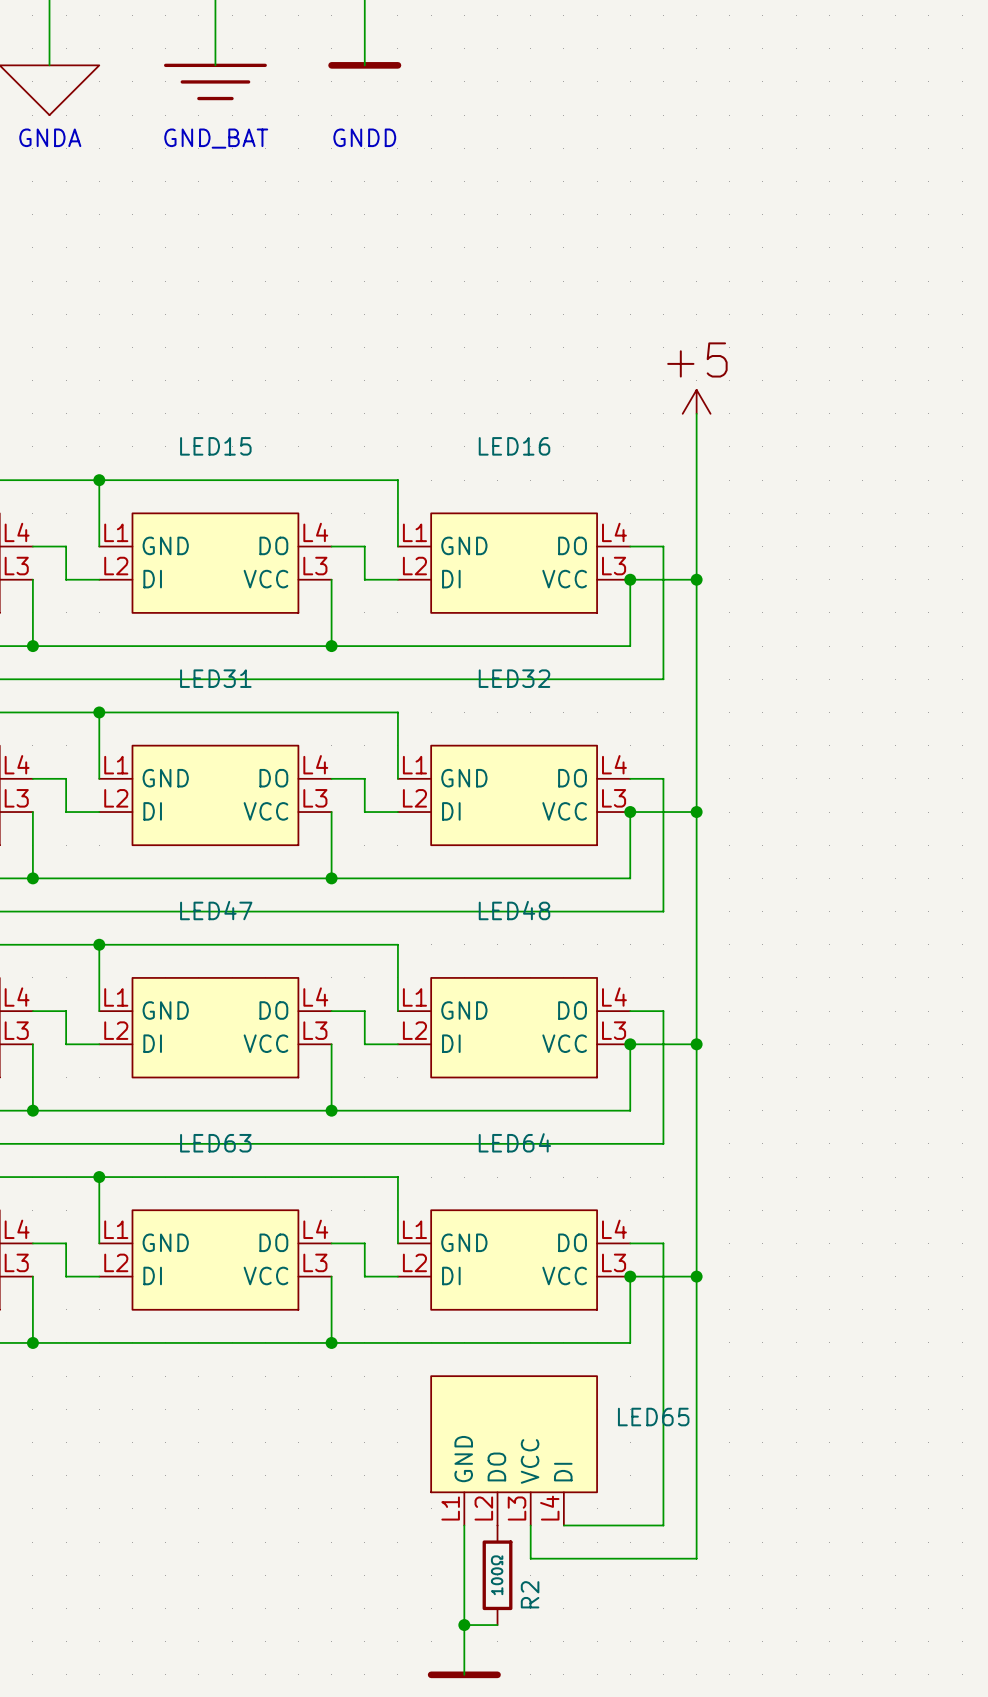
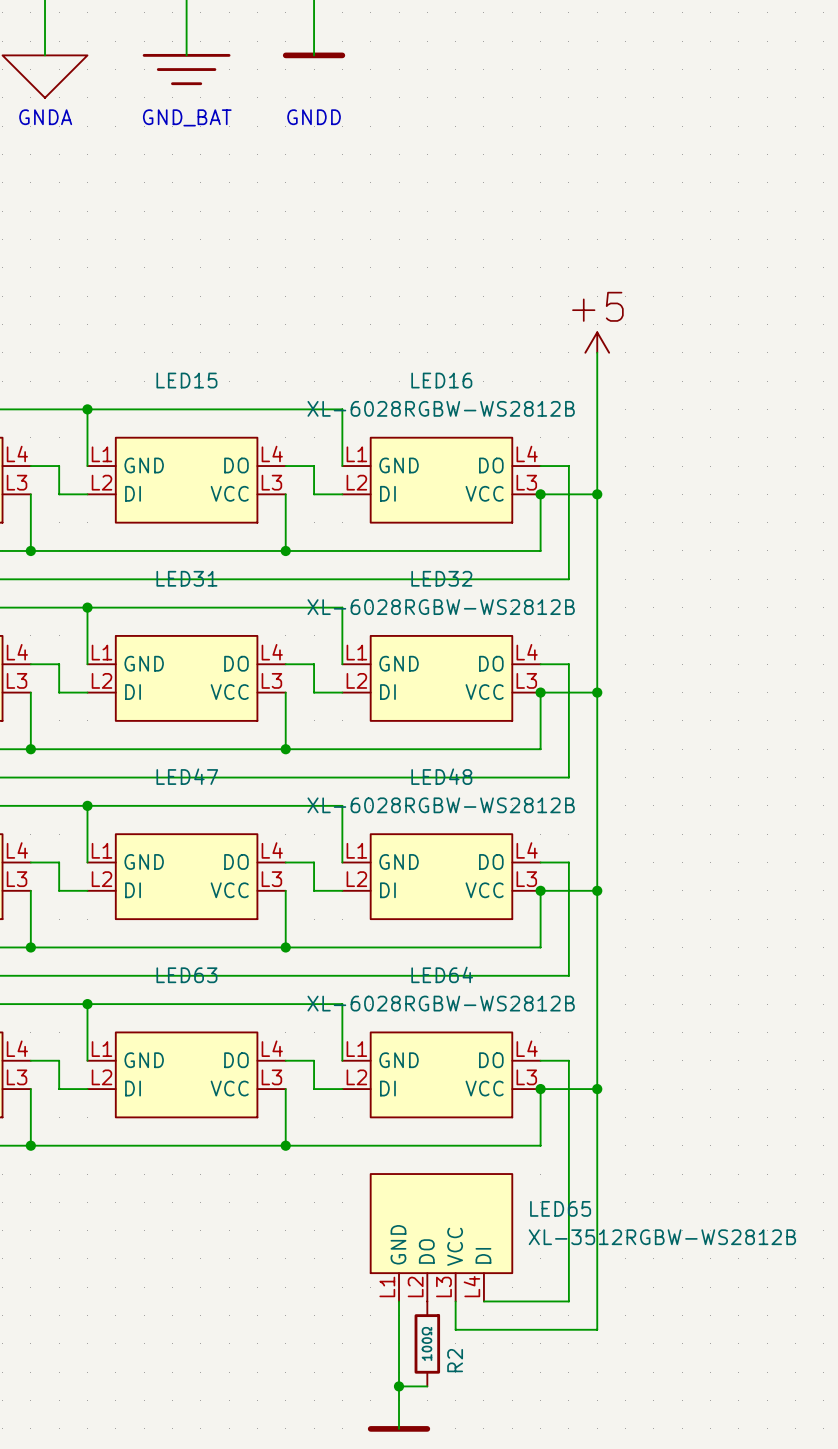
LED16 value: none -> XL-6028RGBW-WS2812B (441, 408)
LED32 value: none -> XL-6028RGBW-WS2812B (441, 607)
LED48 value: none -> XL-6028RGBW-WS2812B (441, 805)
LED64 value: none -> XL-6028RGBW-WS2812B (441, 1003)
LED65 value: none -> XL-3512RGBW-WS2812B (662, 1237)

